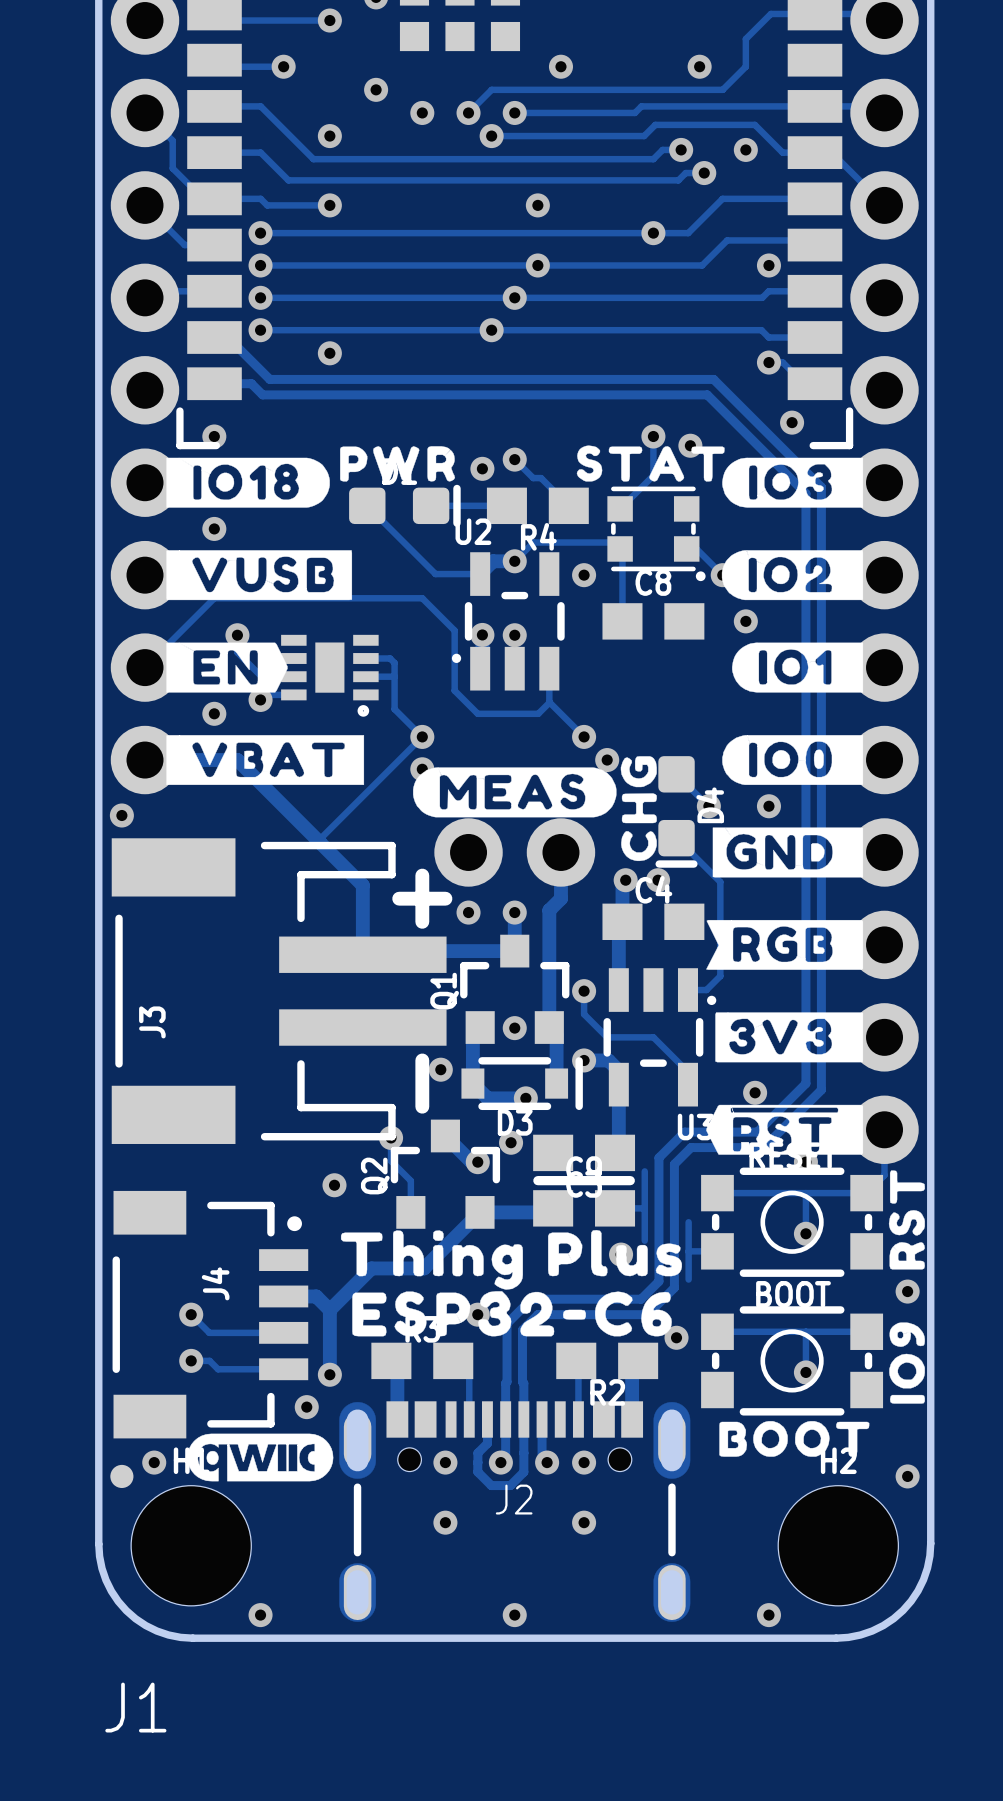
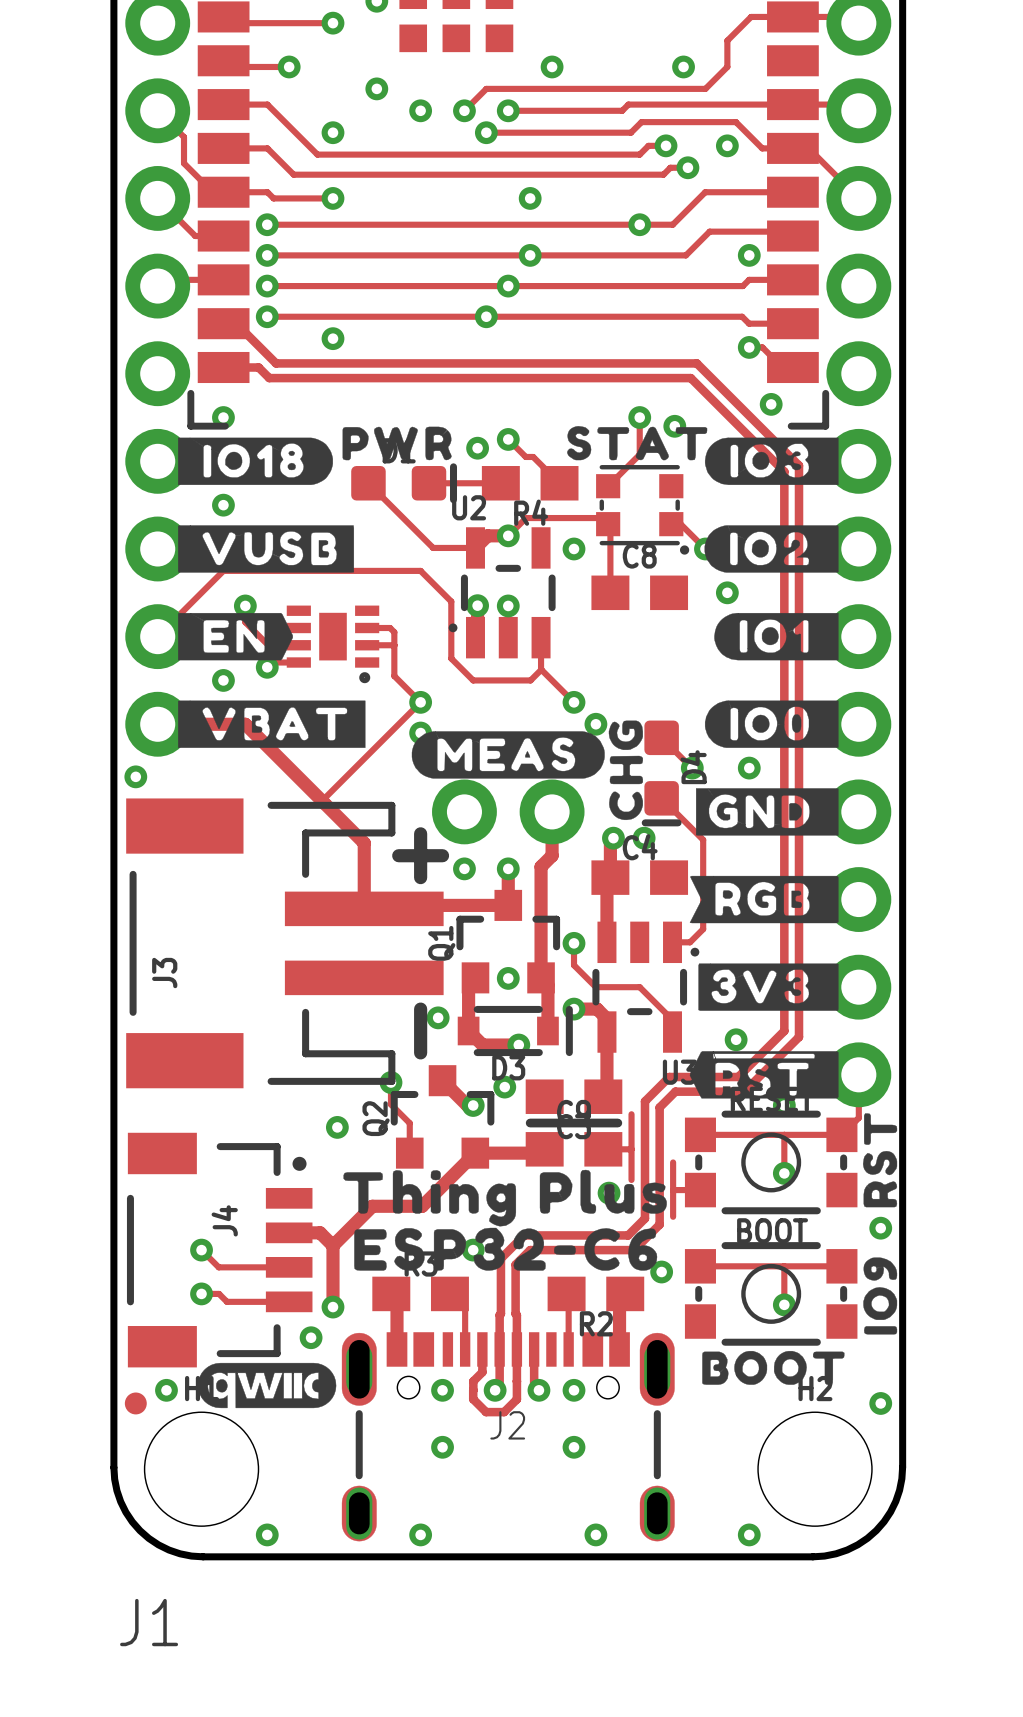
via: none -> (420, 1534)
via: (514, 1615) -> none
via: none -> (595, 1534)

